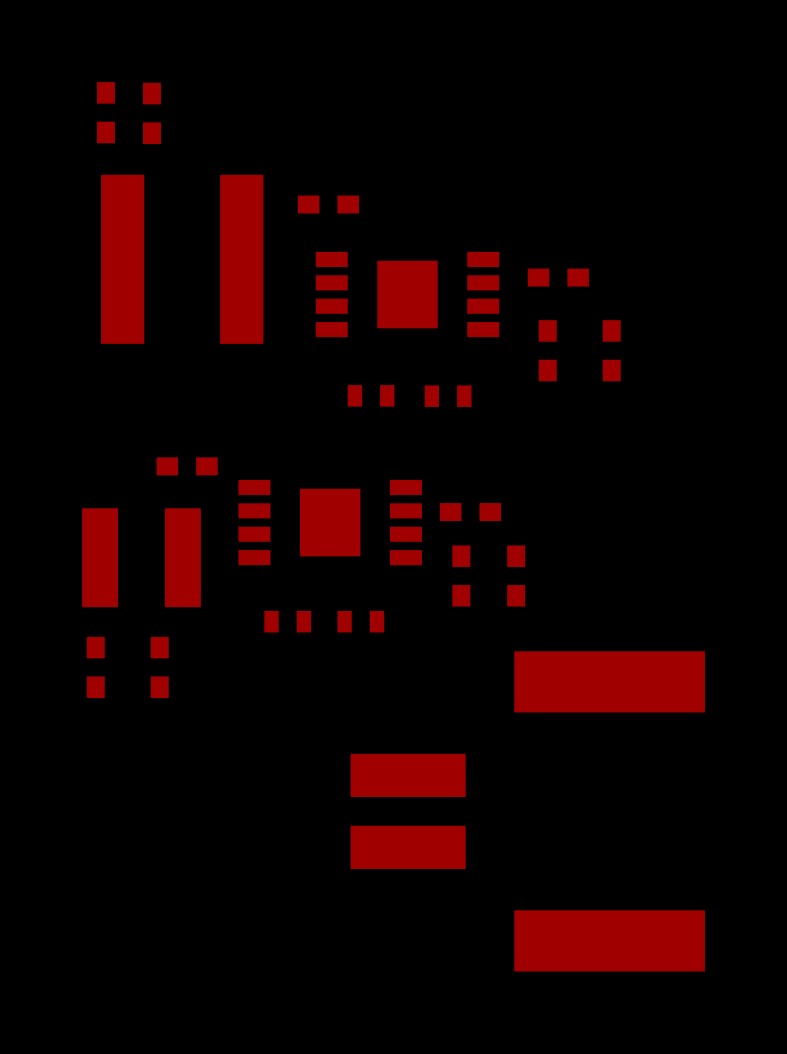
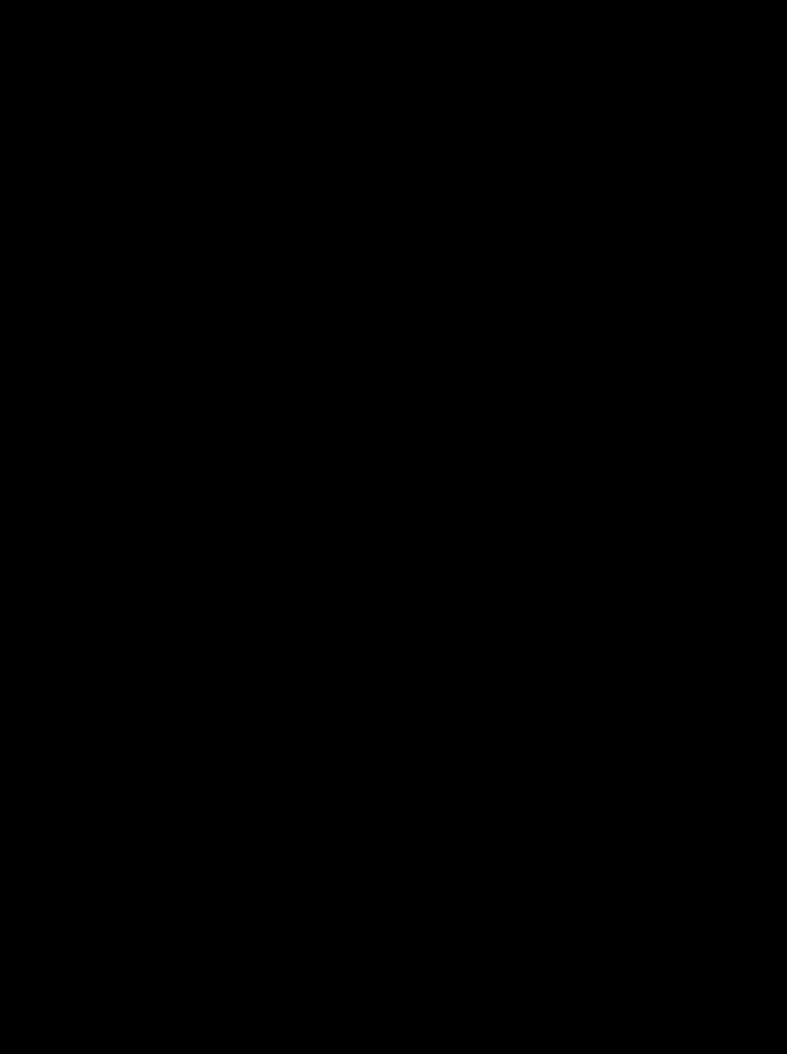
part: (105, 112) -> none
part: (151, 113) -> none
part: (328, 204) -> none
part: (182, 259) -> none
part: (558, 277) -> none
part: (407, 294) -> none
part: (547, 350) -> none
part: (611, 350) -> none
part: (371, 395) -> none
part: (448, 396) -> none
part: (187, 466) -> none
part: (470, 512) -> none
part: (330, 522) -> none
part: (141, 557) -> none
part: (461, 576) -> none
part: (516, 576) -> none
part: (287, 621) -> none
part: (360, 621) -> none
part: (95, 667) -> none
part: (159, 667) -> none
part: (527, 811) -> none

